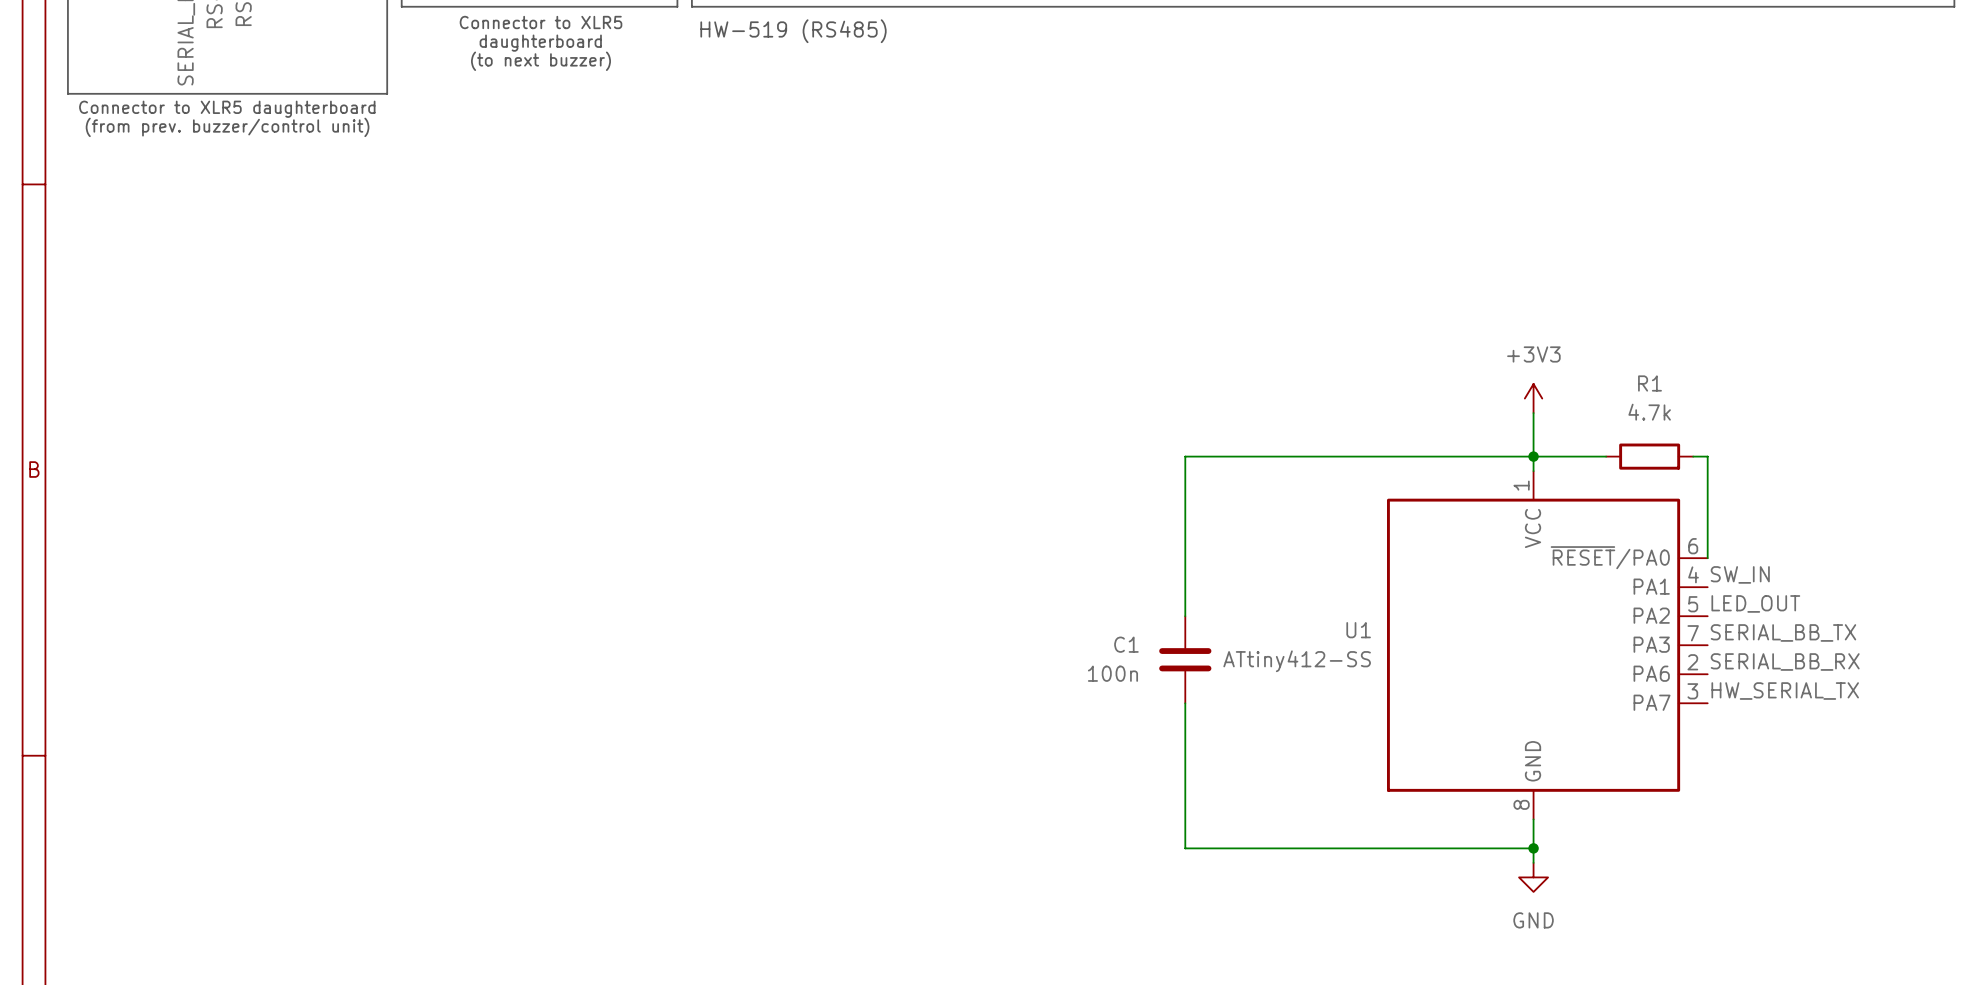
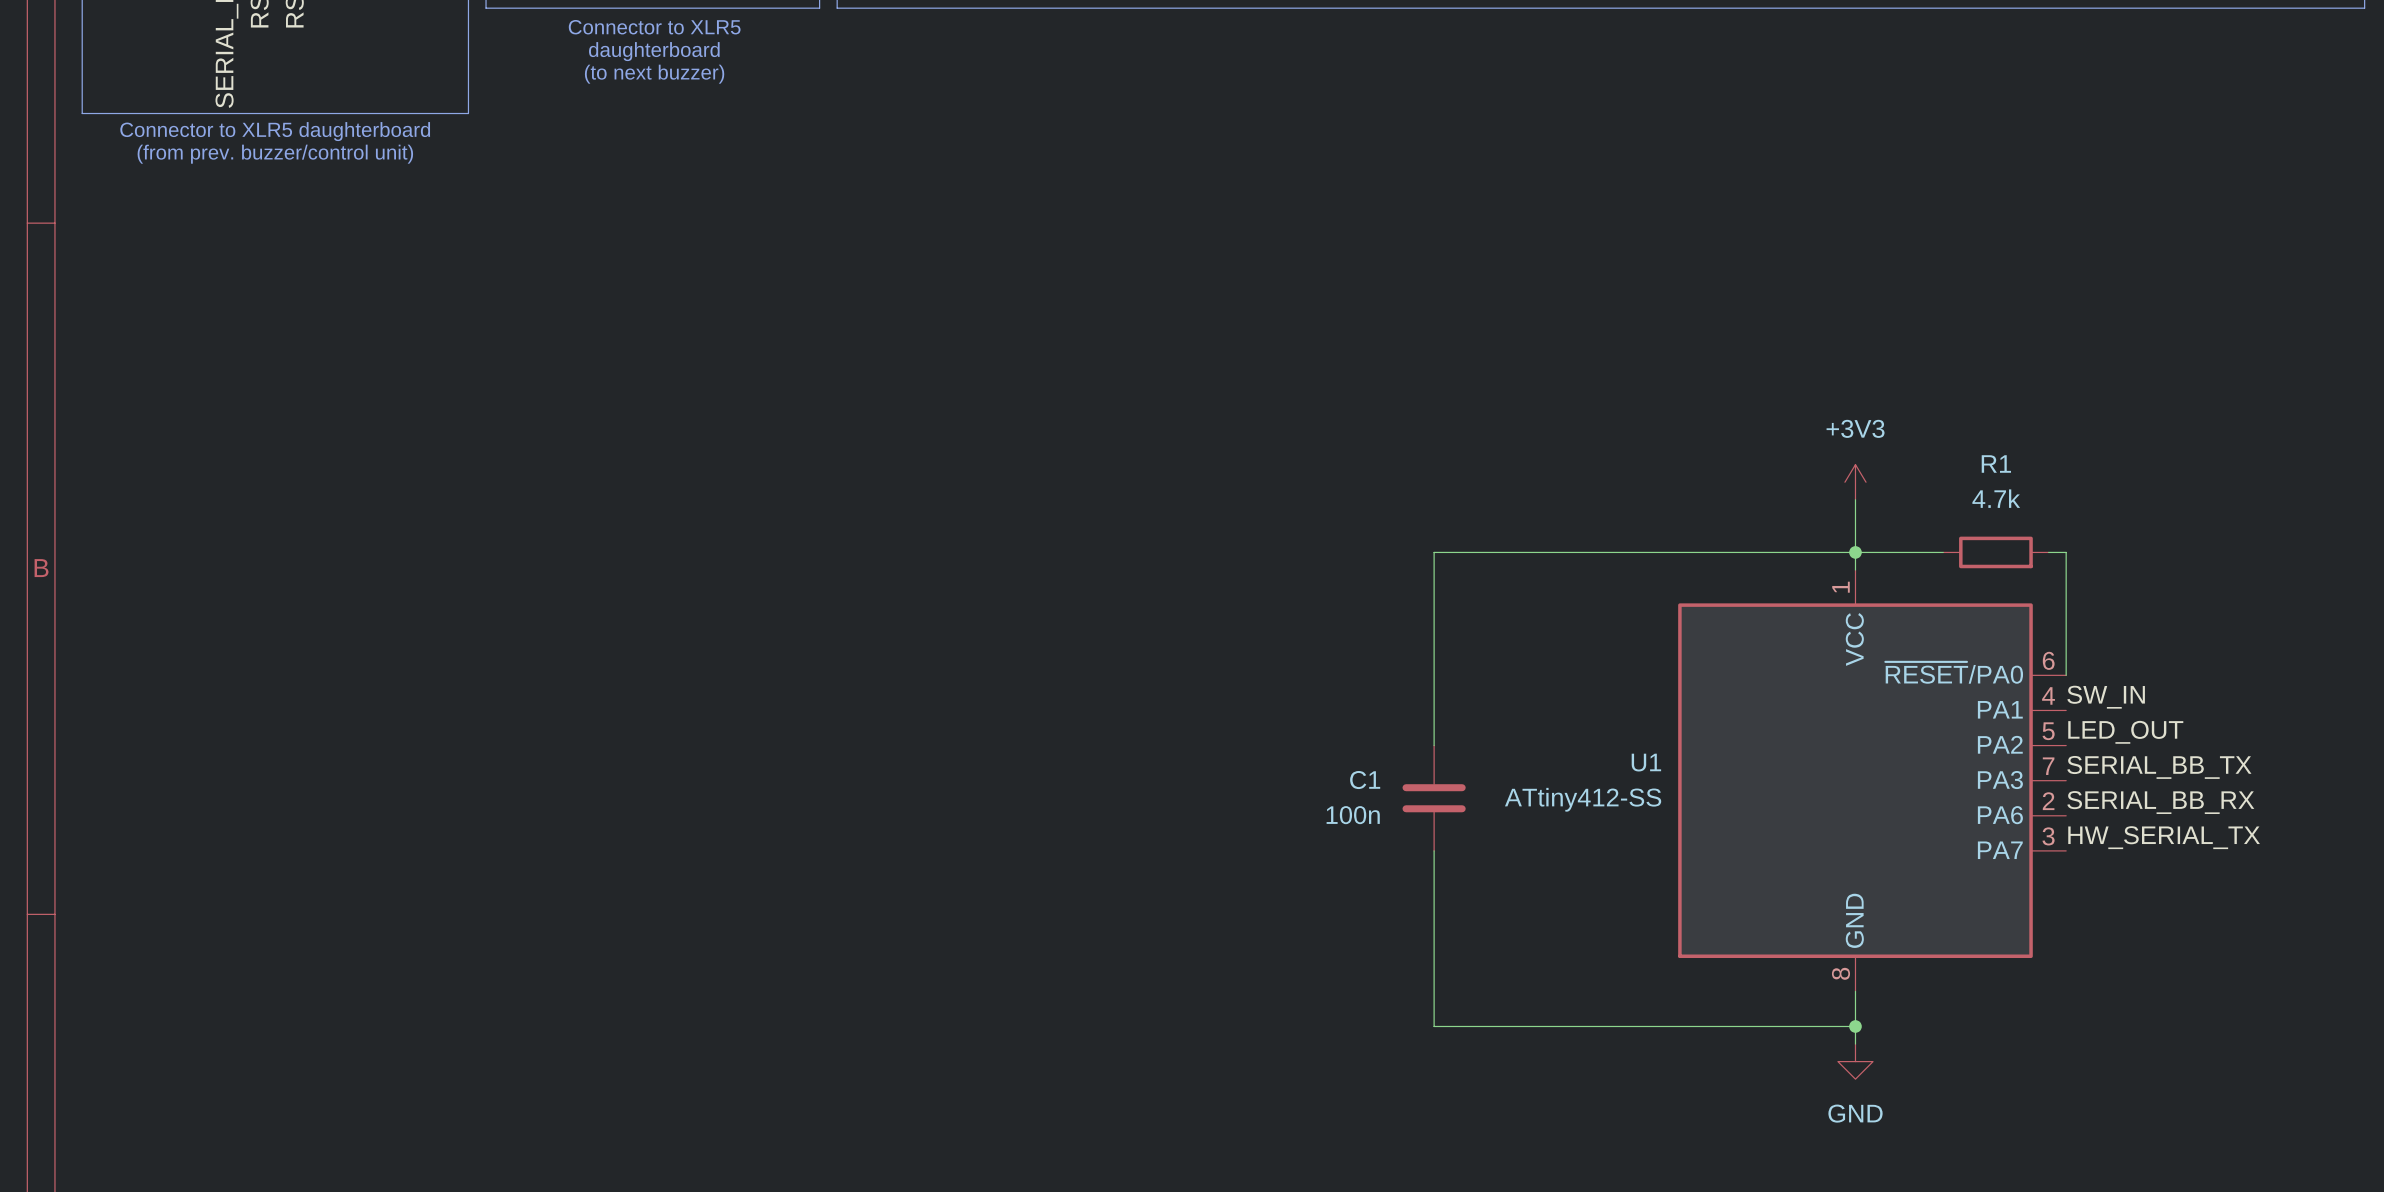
text: HW-519 (RS485) (793, 31) -> none

